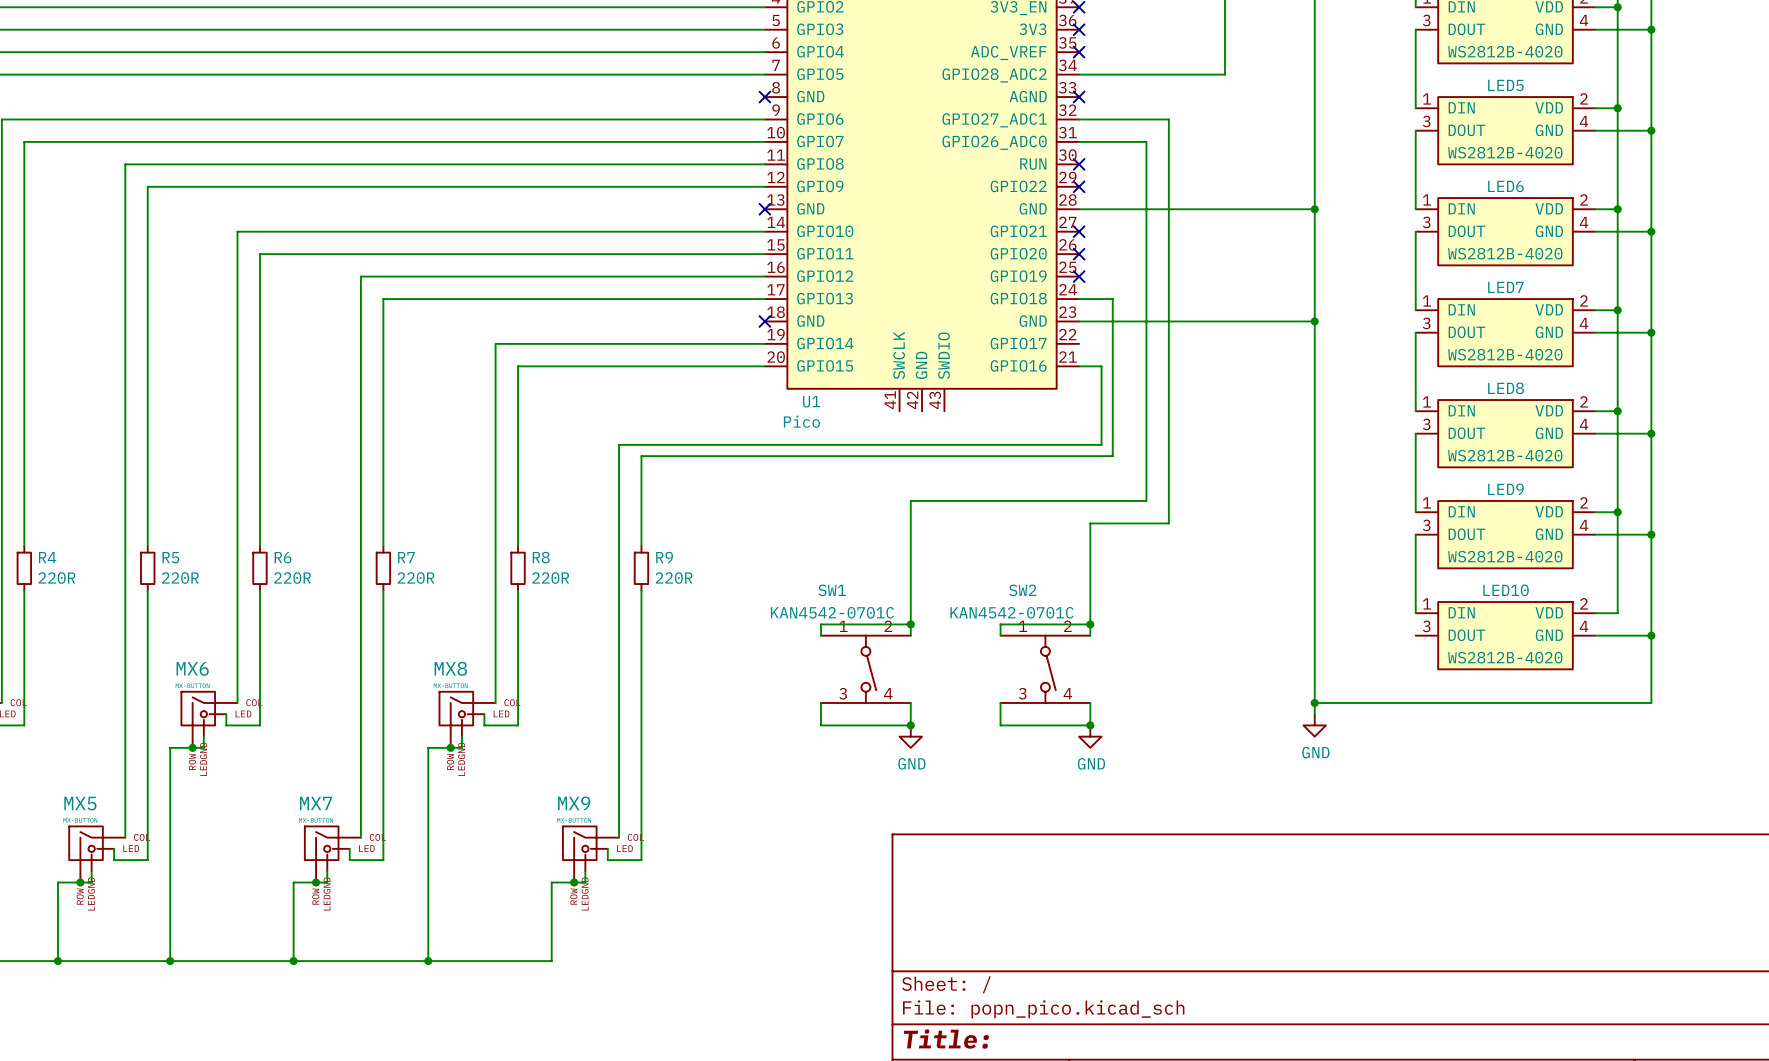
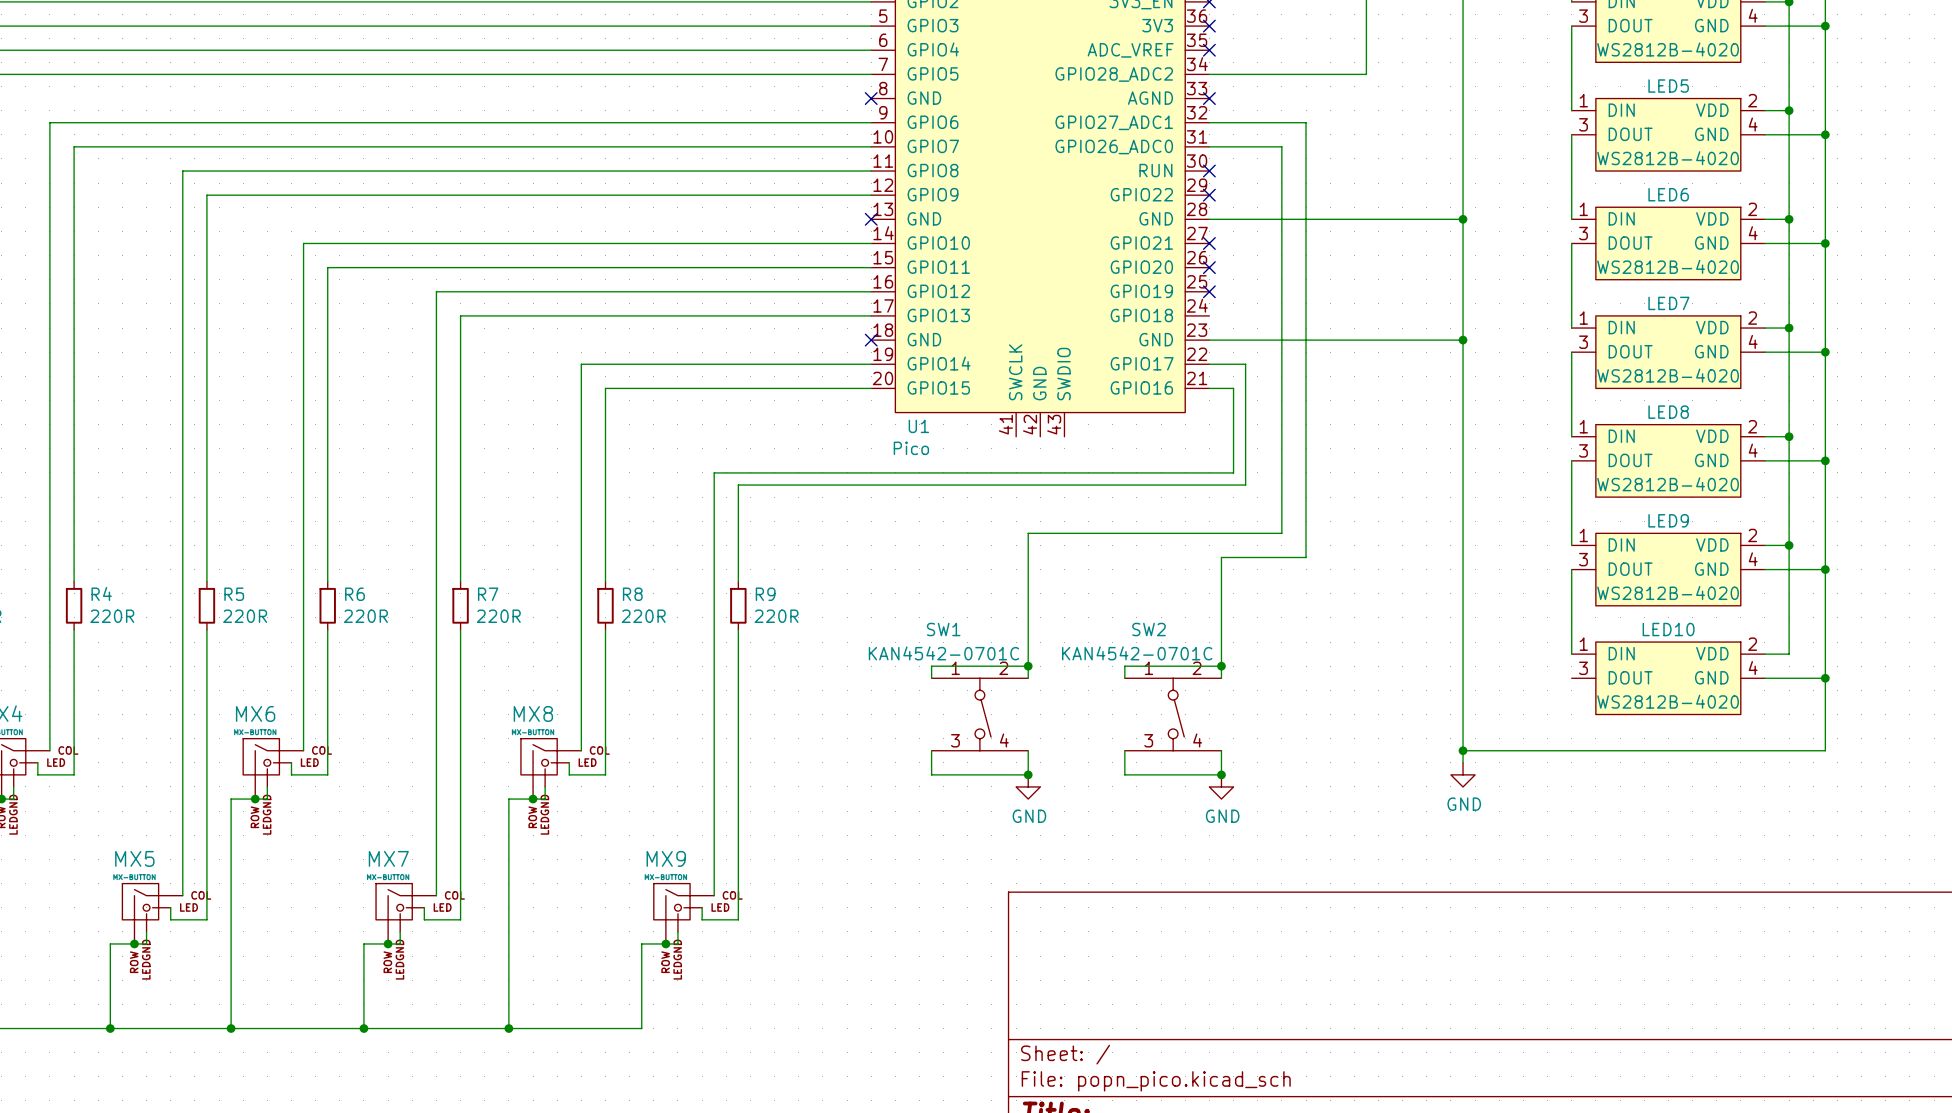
wire: (1079, 299) (1112, 299) (1112, 343) -> (1209, 364) (1245, 364)

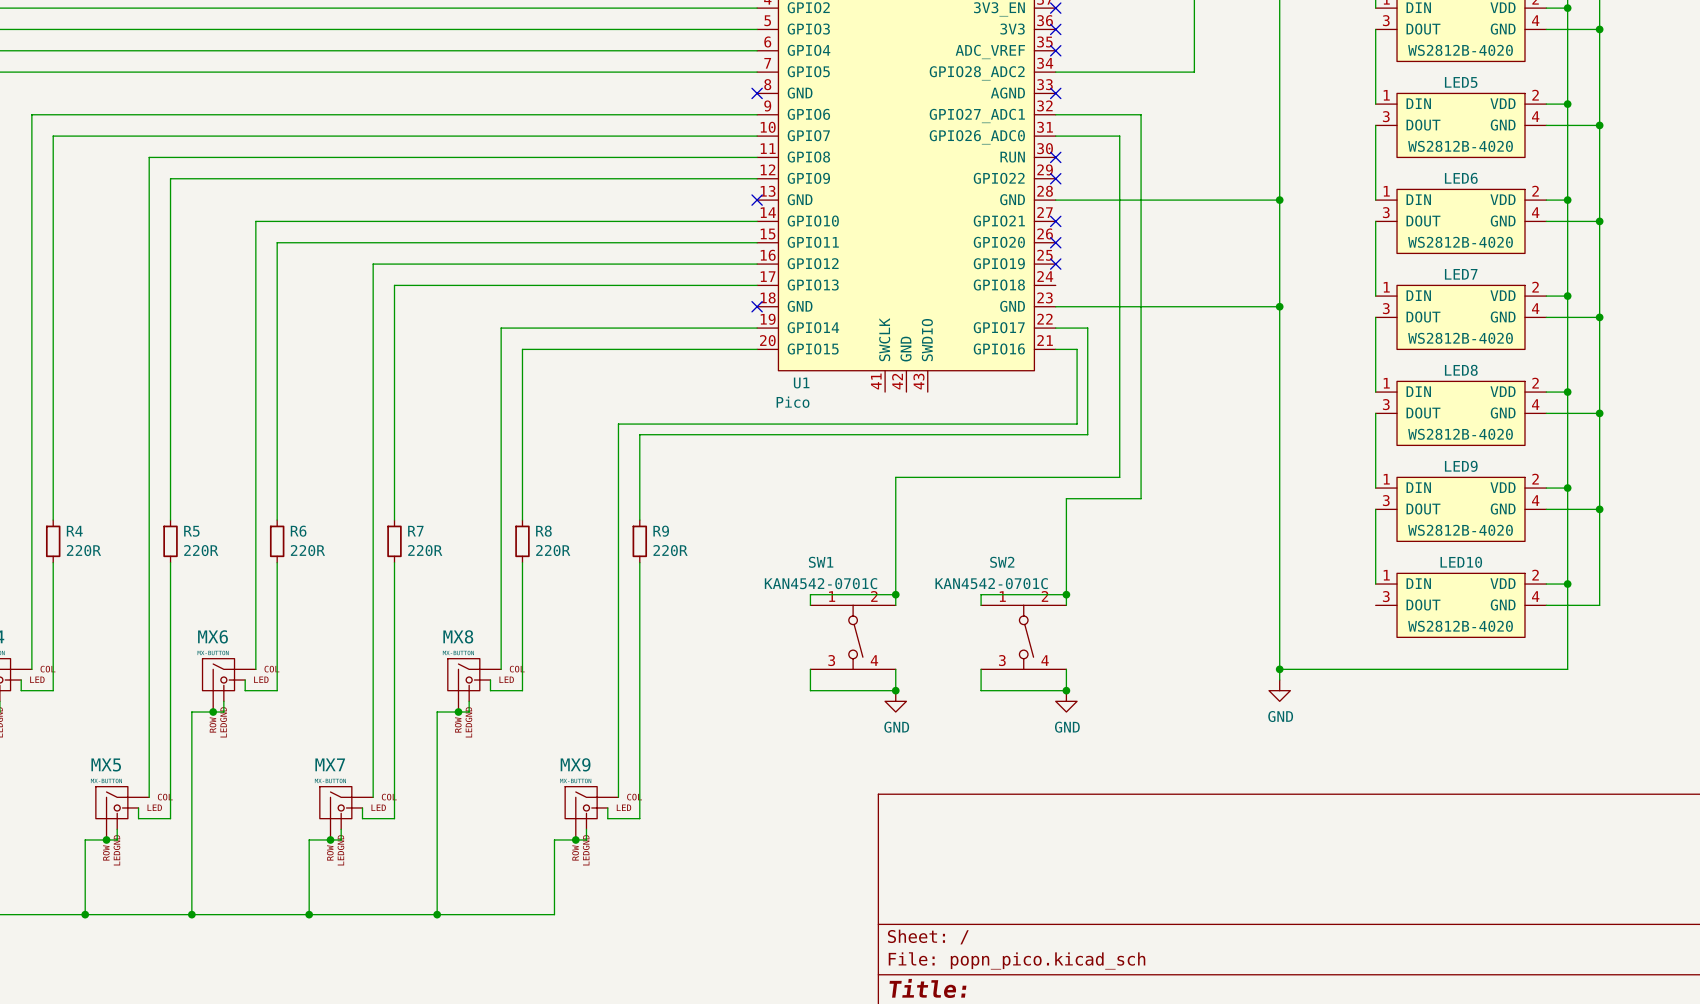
wire: (1825, 678) (1825, 750) (1789, 750) -> (1567, 584) (1567, 669)
junction position: (1825, 678) -> (1567, 584)

